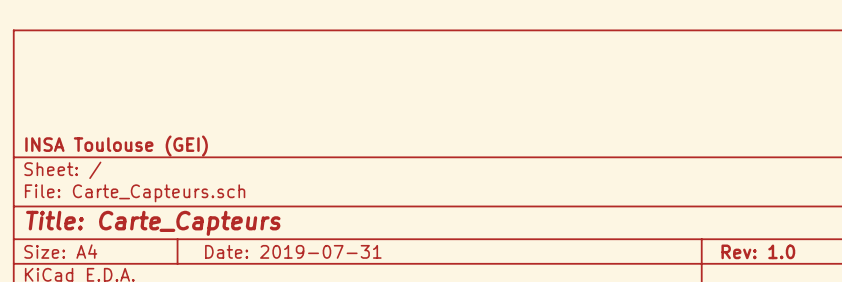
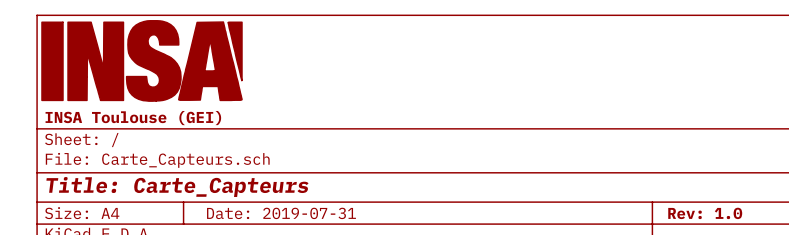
part: none -> (141, 60)

